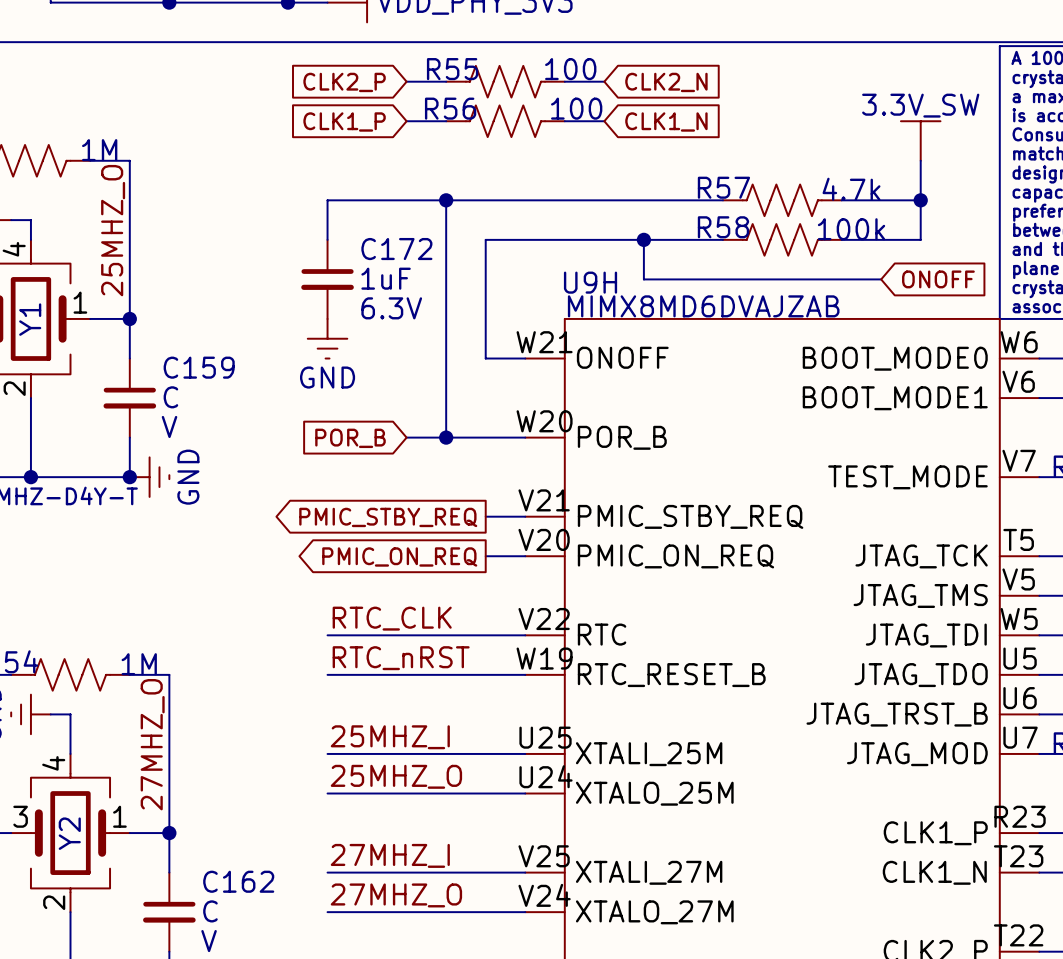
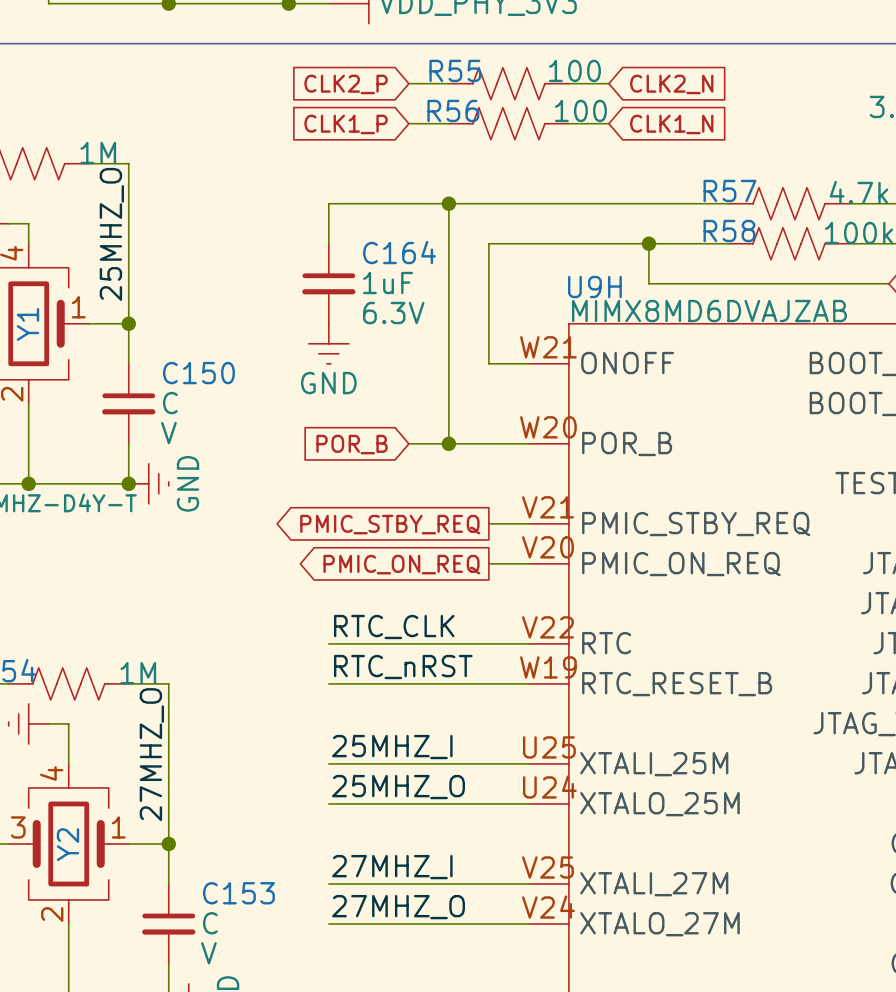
C172 name: C172 (396, 249) -> C164 (399, 252)
C159 name: C159 (199, 367) -> C150 (198, 373)
C162 name: C162 (238, 881) -> C153 (238, 893)

